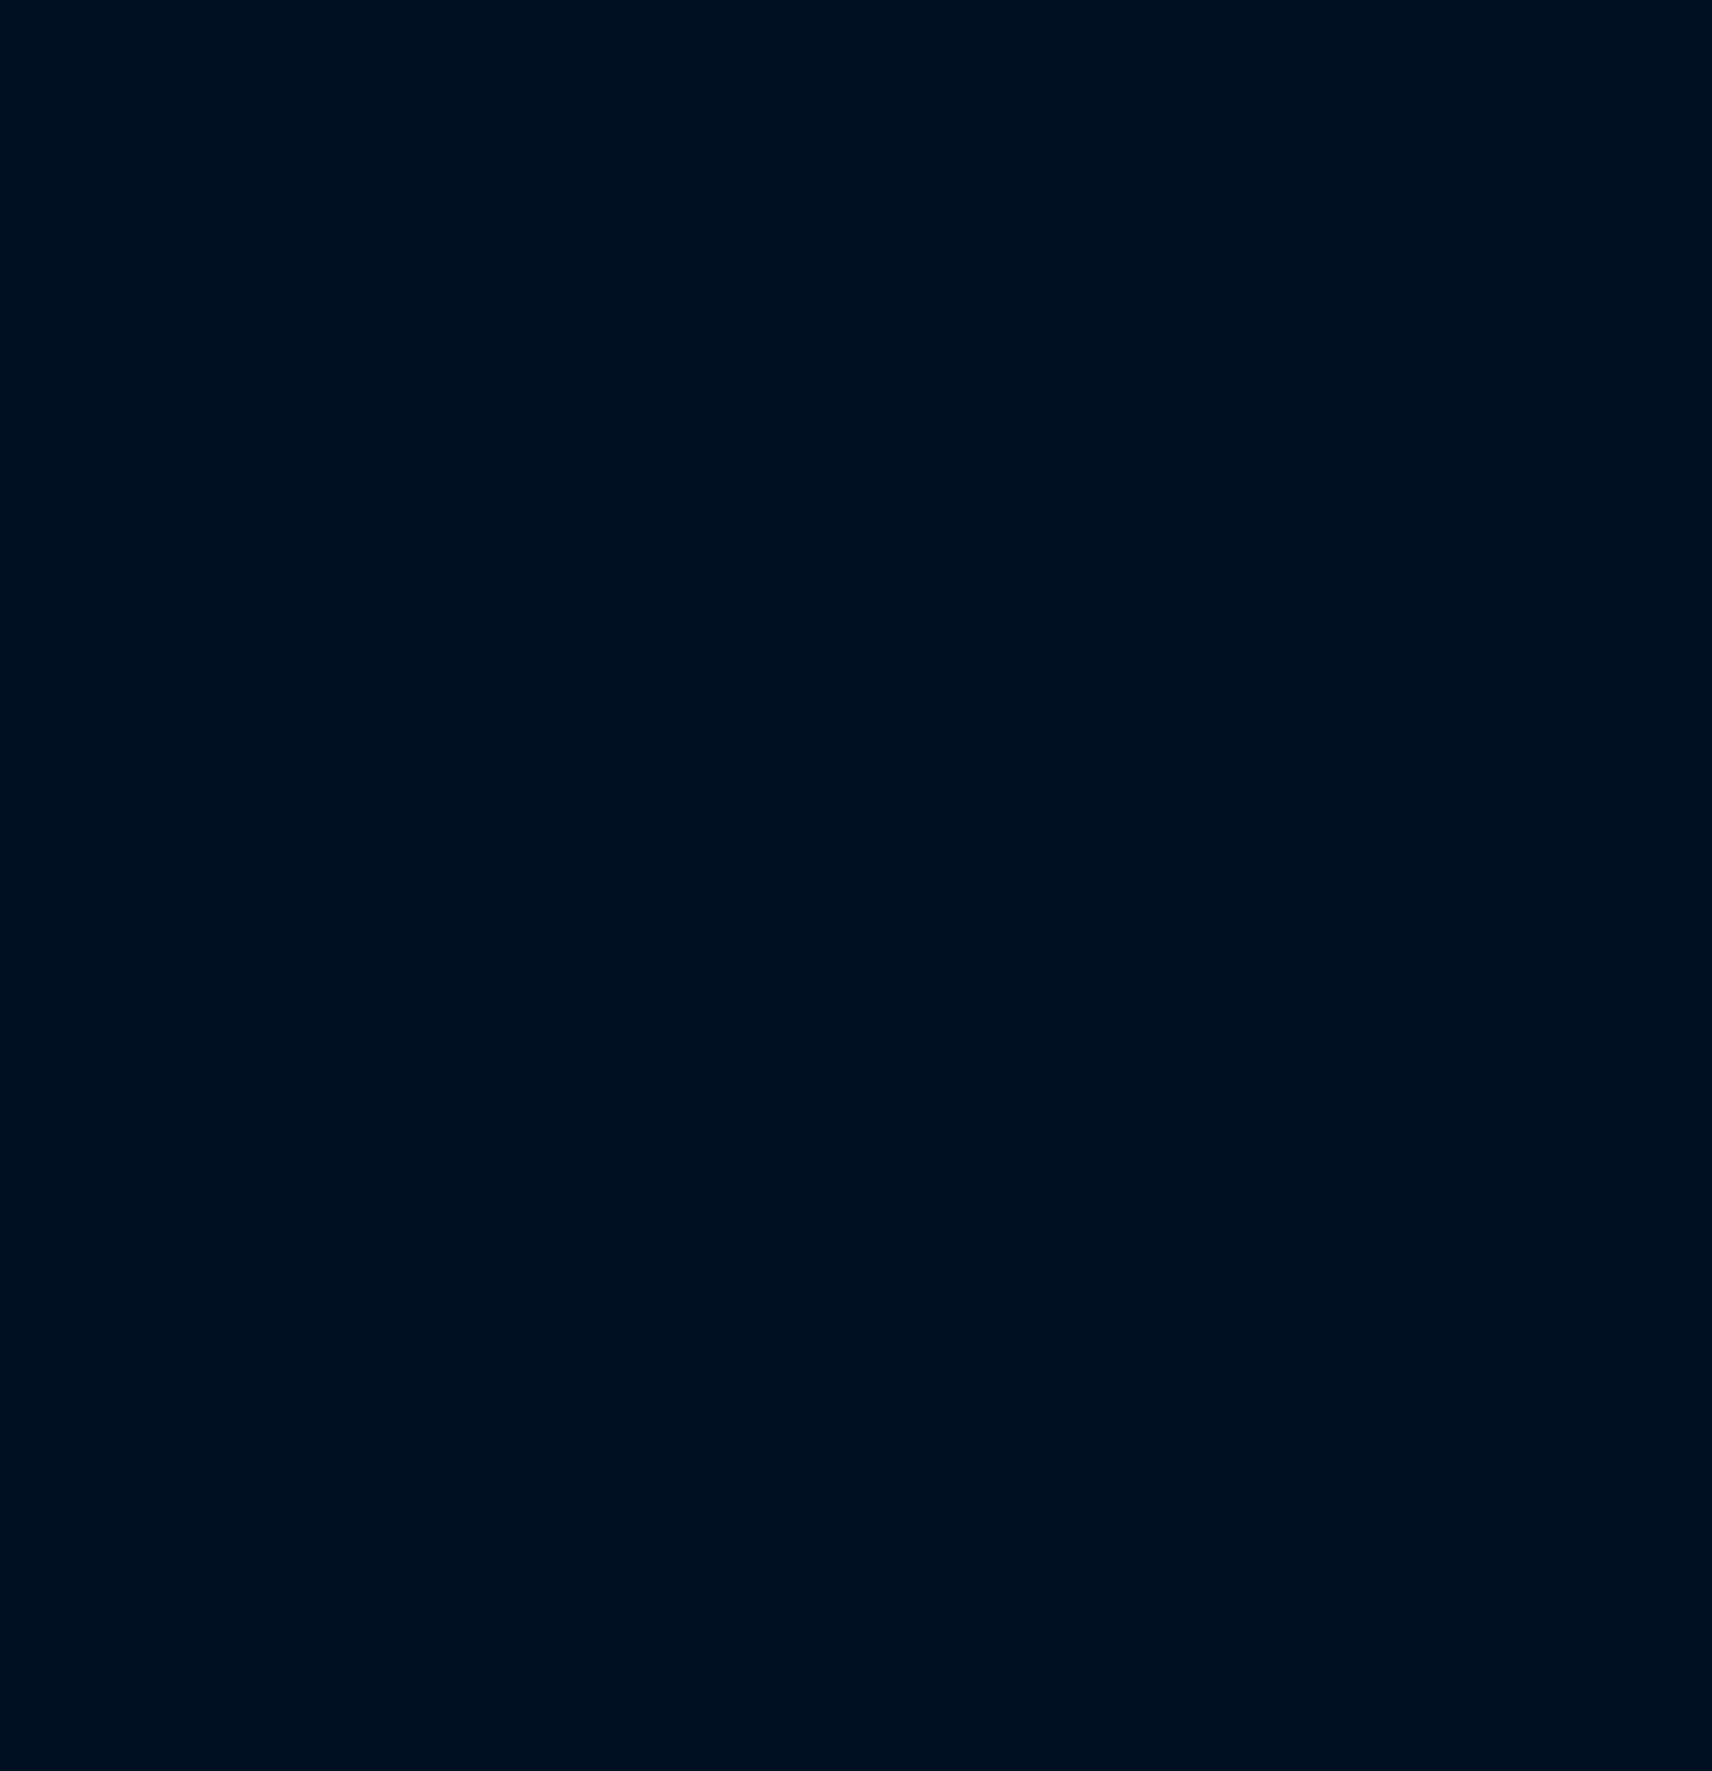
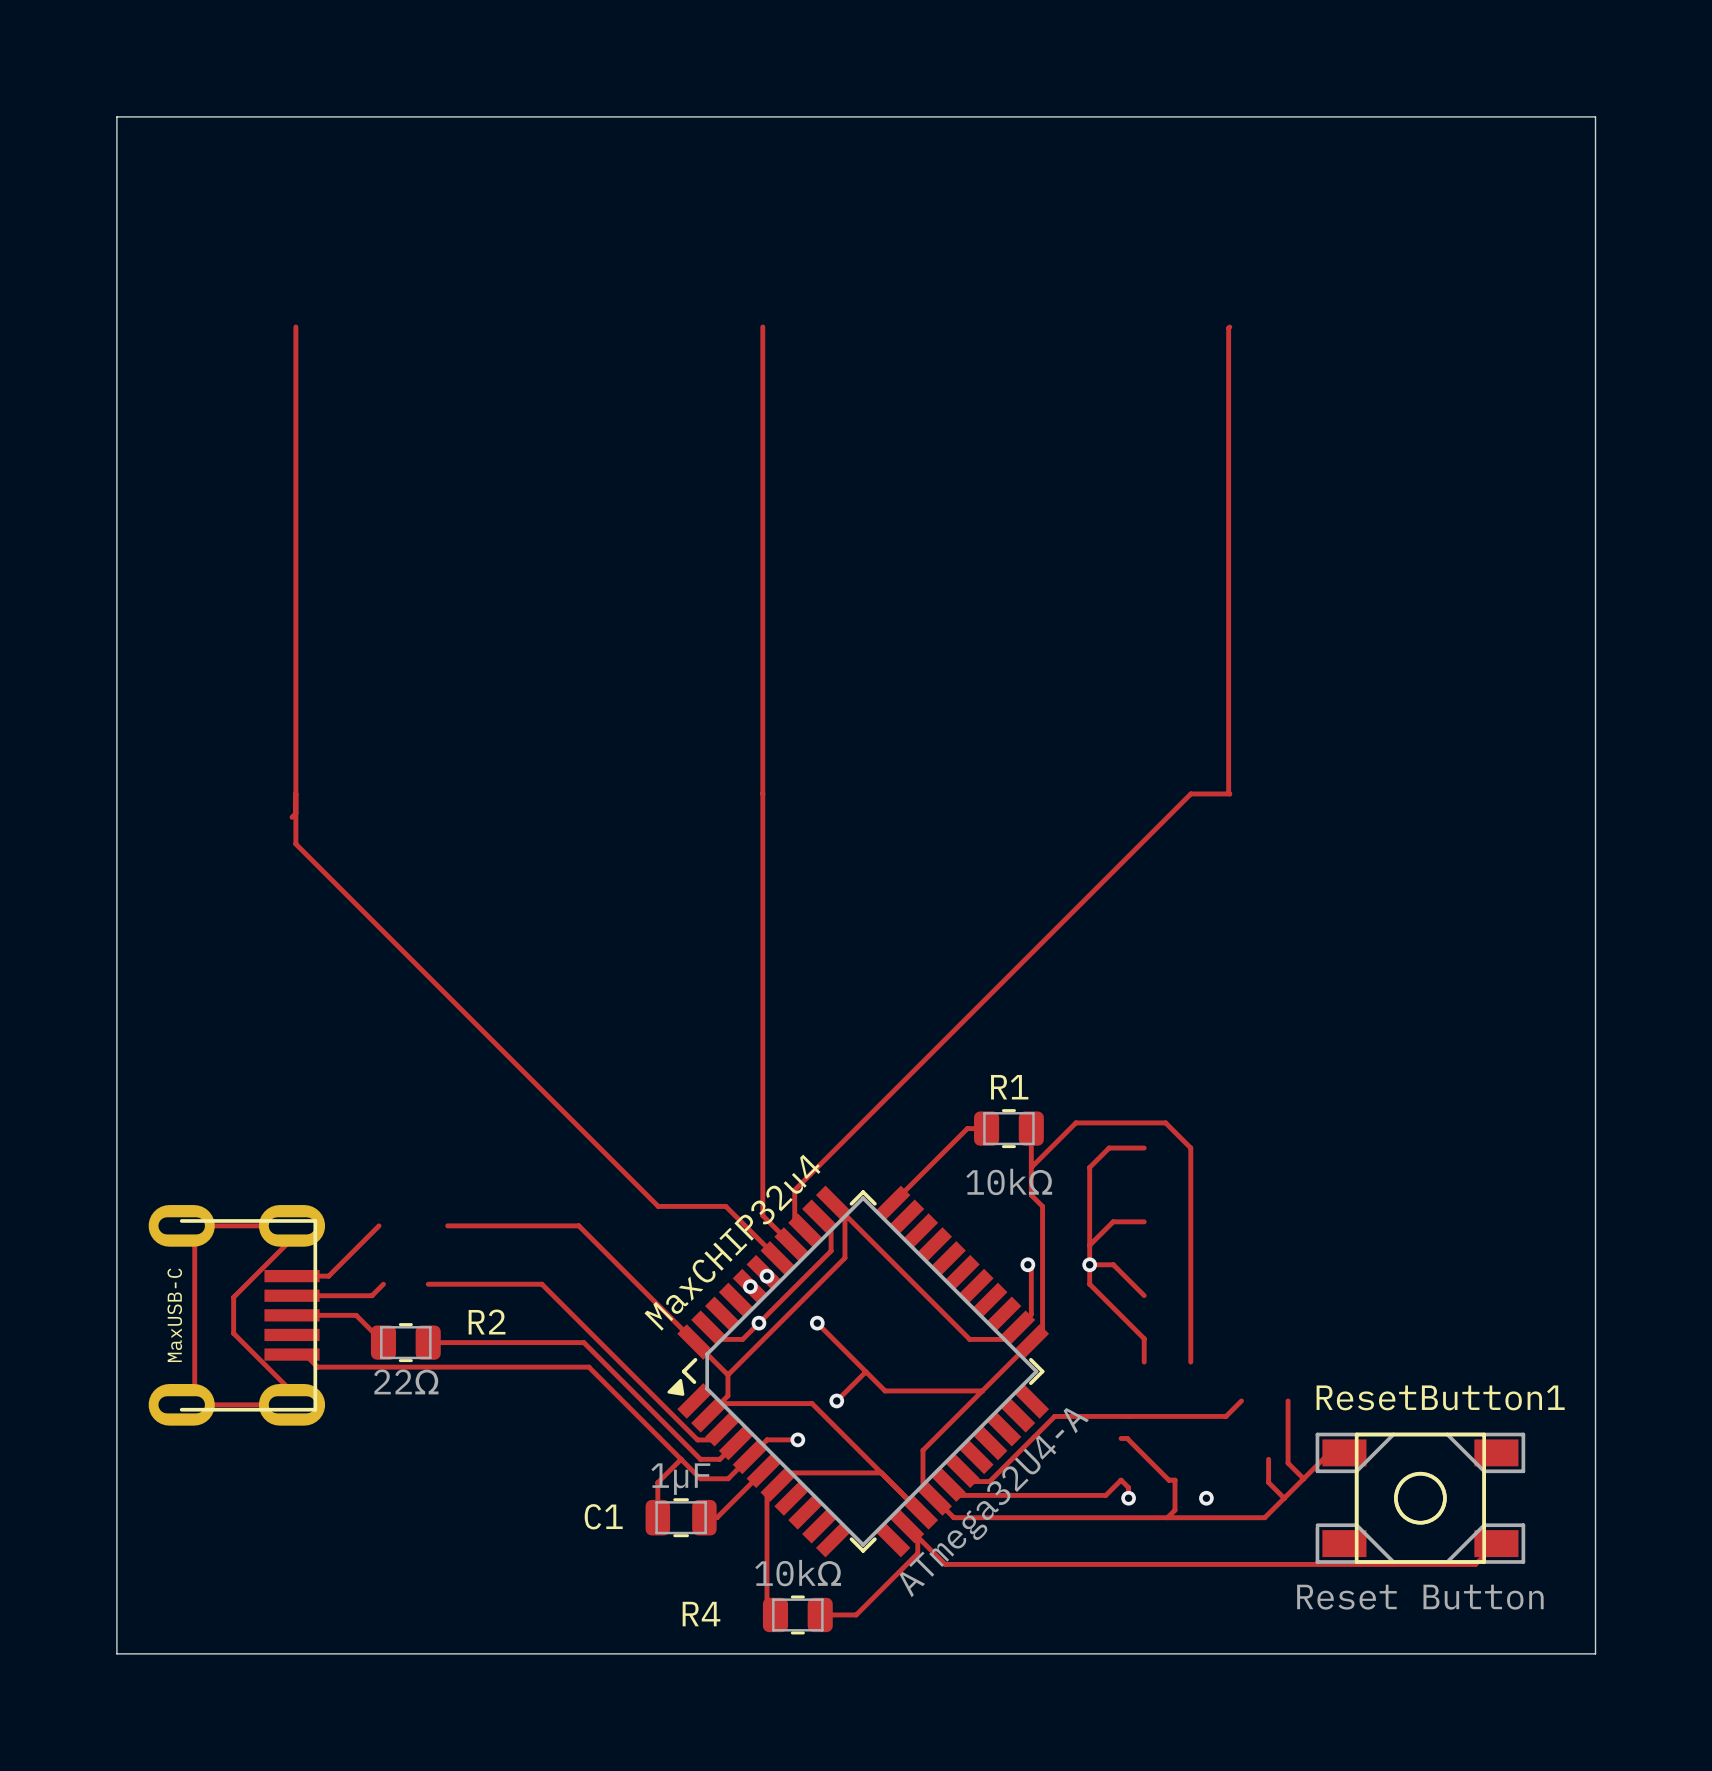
board edge: none -> (116, 116) (1595, 116) (1595, 1653) (116, 1653) (116, 116)
track: none -> (295, 327) (295, 844) (658, 1206) (725, 1206) (778, 1258)
track: none -> (762, 327) (762, 1215) (792, 1244)
track: none -> (1229, 327) (1229, 793) (1190, 793) (794, 1190) (794, 1219) (805, 1231)
track: none -> (295, 813) (292, 817)
track: none -> (986, 1128) (967, 1128) (892, 1203)
R1: none -> 10kΩ (1008, 1128)
track: none -> (1031, 1128) (1031, 1195) (1042, 1206) (1042, 1330) (922, 1450) (922, 1486) (953, 1517) (1264, 1517) (1329, 1452) (1344, 1452)
track: none -> (1144, 1148) (1109, 1148) (1089, 1167) (1089, 1284) (1144, 1338) (1144, 1362)
track: none -> (1031, 1167) (1075, 1122) (1165, 1122) (1190, 1148) (1190, 1362)
track: none -> (833, 1203) (969, 1339) (1006, 1339) (1031, 1314) (1031, 1264) (1027, 1264)
track: none -> (844, 1214) (844, 1257) (727, 1374)
track: none -> (819, 1217) (831, 1228) (831, 1251) (742, 1339) (720, 1339) (708, 1328)
track: none -> (1144, 1221) (1113, 1221) (1089, 1245)
track: none -> (194, 1225) (305, 1225) (233, 1297) (233, 1333) (305, 1404) (194, 1404) (194, 1225)
track: none -> (379, 1225) (328, 1276) (305, 1276)
track: none -> (447, 1225) (578, 1225) (727, 1374)
via: none -> (1027, 1264)
track: none -> (1089, 1264) (1113, 1264) (1144, 1295)
via: none -> (1089, 1264)
via: none -> (766, 1276)
track: none -> (383, 1284) (371, 1295) (305, 1295)
track: none -> (428, 1284) (541, 1284) (697, 1439) (711, 1439) (722, 1428)
via: none -> (750, 1286)
MaxUSB-C: none -> (236, 1315)
track: none -> (305, 1315) (356, 1315) (383, 1342)
via: none -> (758, 1323)
track: none -> (817, 1323) (885, 1390) (982, 1390)
via: none -> (817, 1323)
R2: none -> 22Ω (405, 1342)
track: none -> (428, 1342) (583, 1342) (700, 1459) (719, 1459) (736, 1442)
track: none -> (305, 1354) (317, 1367) (588, 1367) (700, 1478) (728, 1478) (767, 1439) (797, 1439)
MaxCHIP32u4: none -> ATmega32U4-A (858, 1371)
track: none -> (865, 1371) (836, 1400)
track: none -> (727, 1374) (727, 1395) (708, 1414)
via: none -> (836, 1400)
track: none -> (1241, 1400) (1226, 1416) (1054, 1416) (989, 1481) (973, 1481) (961, 1470)
track: none -> (1288, 1400) (1288, 1463) (1303, 1478)
track: none -> (720, 1403) (812, 1403) (920, 1511)
track: none -> (1121, 1438) (1127, 1438) (1168, 1480) (1175, 1480) (1175, 1510) (1167, 1517)
via: none -> (797, 1439)
track: none -> (681, 1459) (657, 1482) (657, 1517)
track: none -> (1268, 1459) (1268, 1482) (1284, 1498)
track: none -> (764, 1470) (716, 1517) (704, 1517)
track: none -> (881, 1472) (789, 1472) (766, 1495) (766, 1606) (775, 1614)
track: none -> (948, 1484) (959, 1495) (1105, 1495) (1121, 1480) (1128, 1487) (1128, 1498)
via: none -> (1128, 1498)
via: none -> (1206, 1498)
ResetButton1: none -> Reset Button (1420, 1498)
C1: none -> 1µF (681, 1517)
track: none -> (906, 1525) (945, 1564) (1475, 1564) (1496, 1543)
track: none -> (917, 1537) (917, 1553) (856, 1614) (820, 1614)
R4: none -> 10kΩ (797, 1614)

